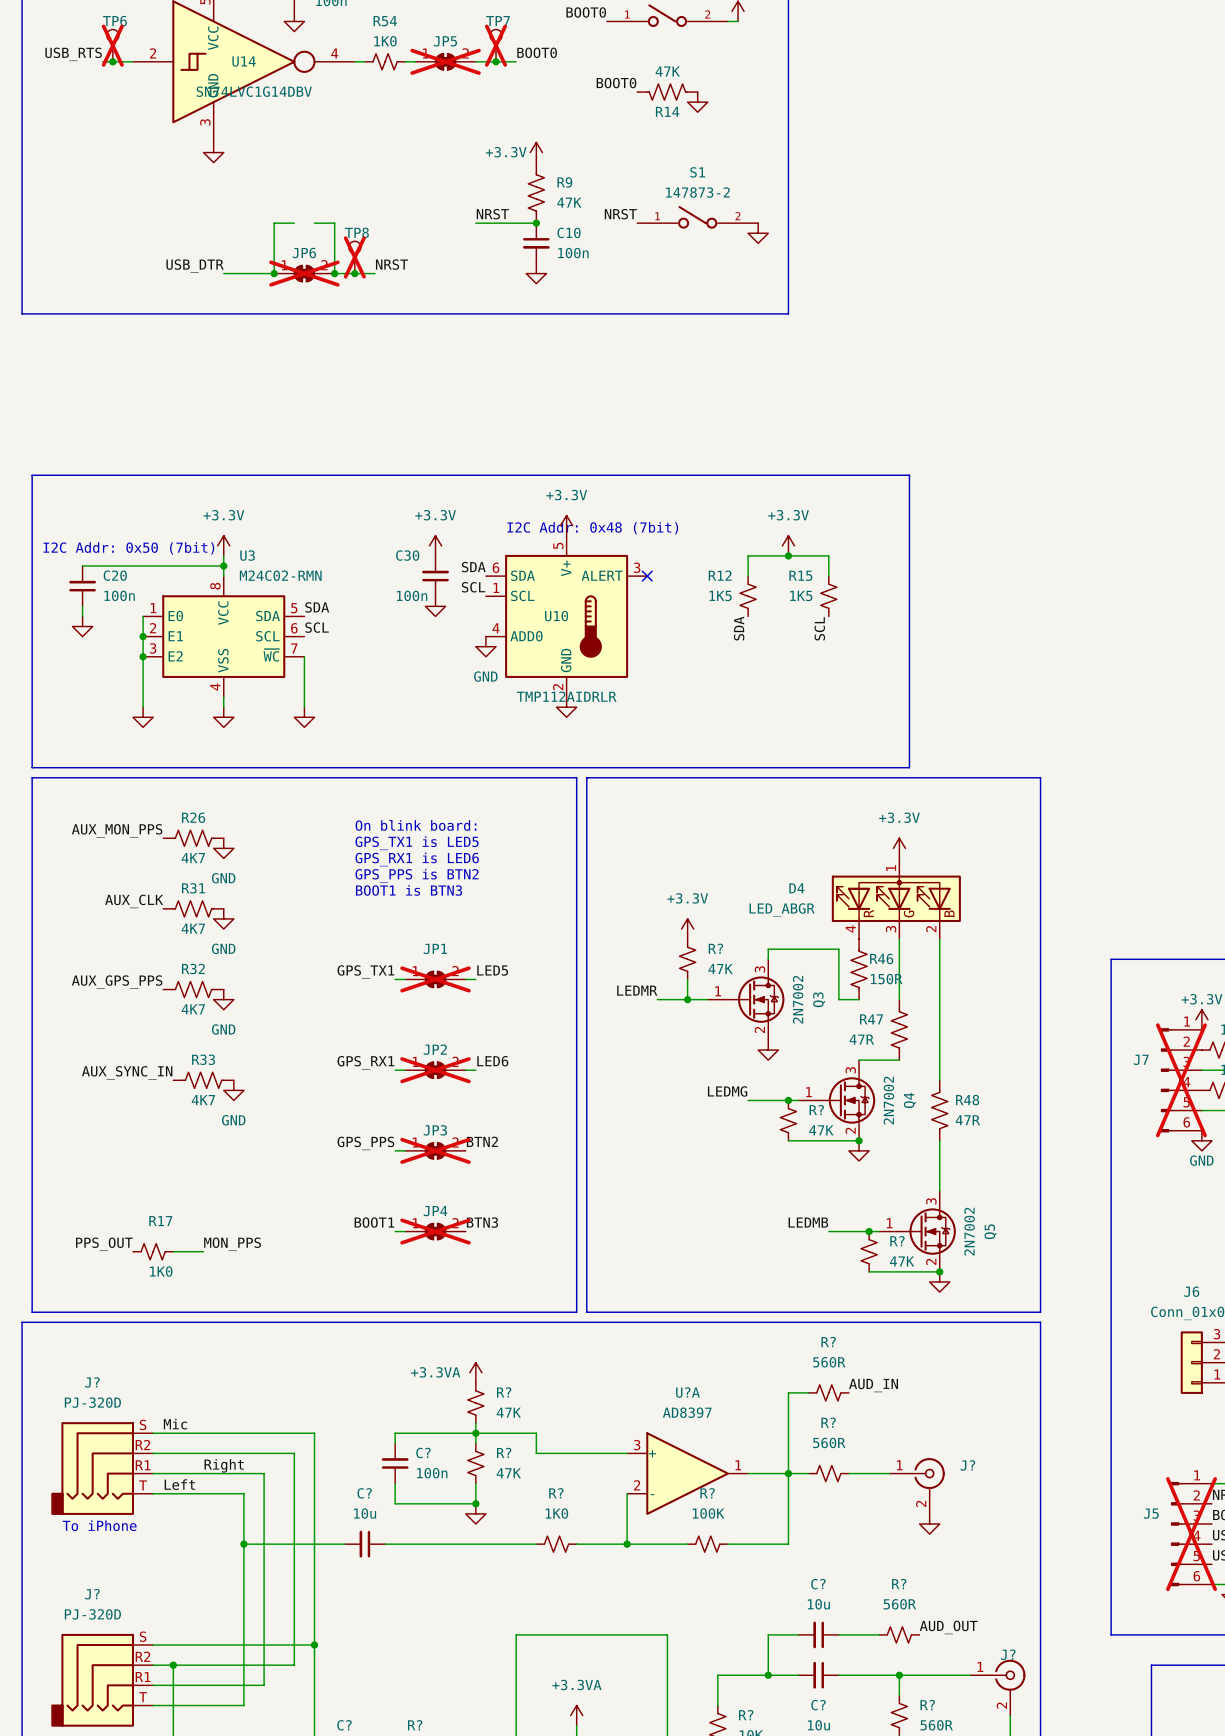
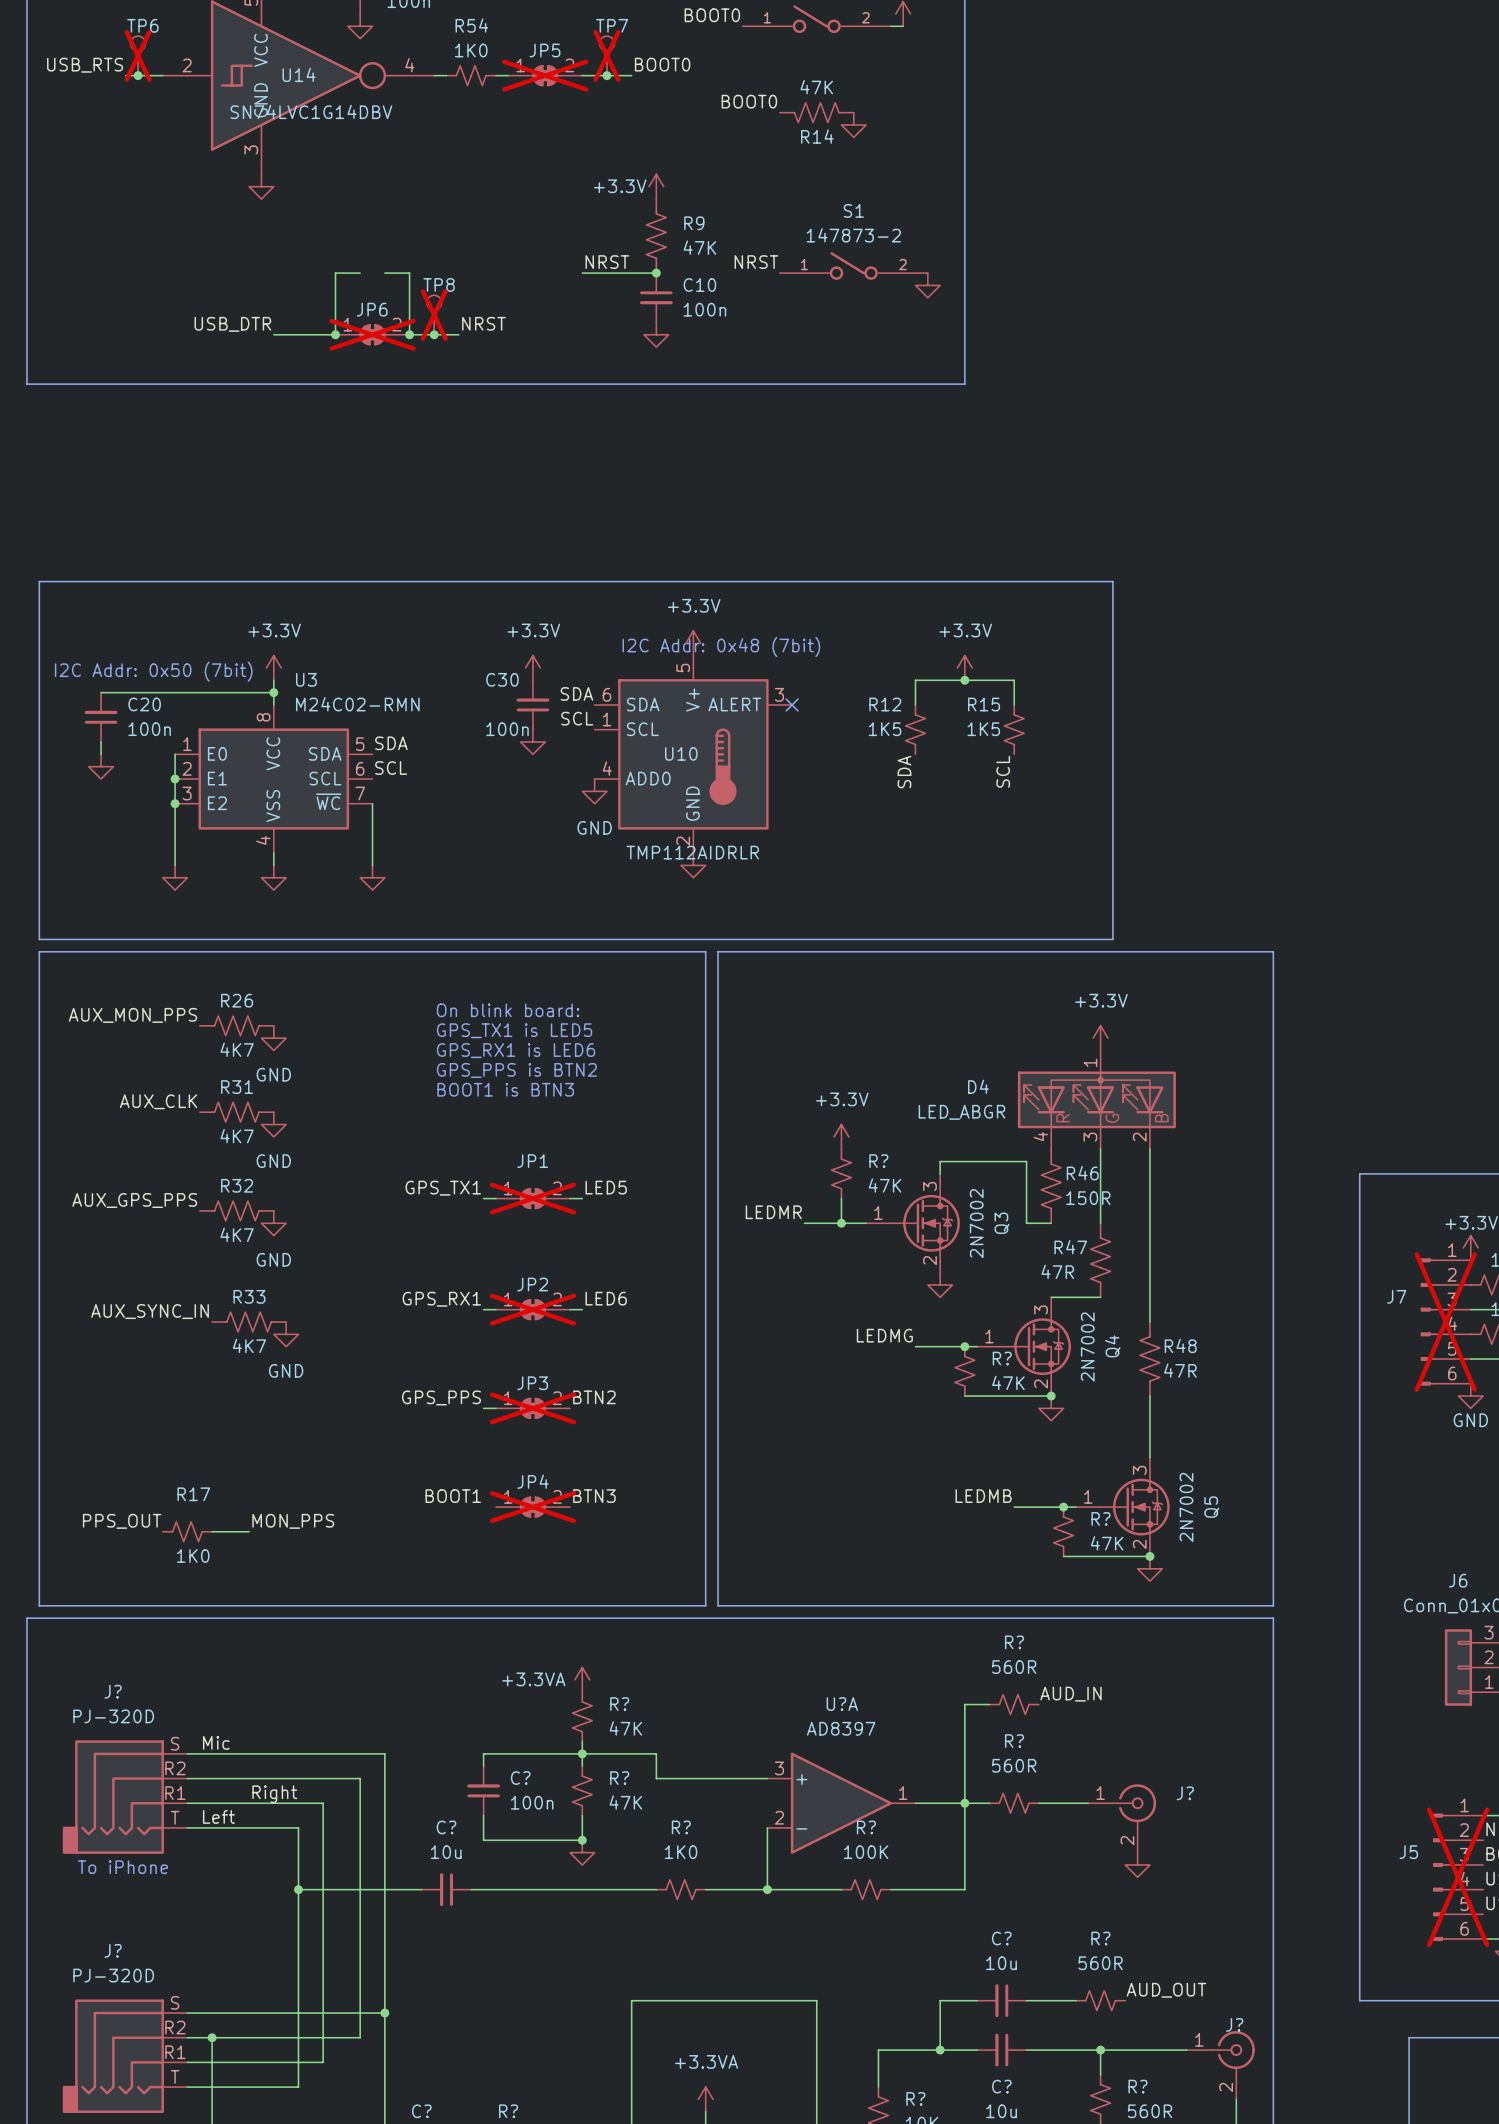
wire: (395, 1231) (405, 1231) -> none

